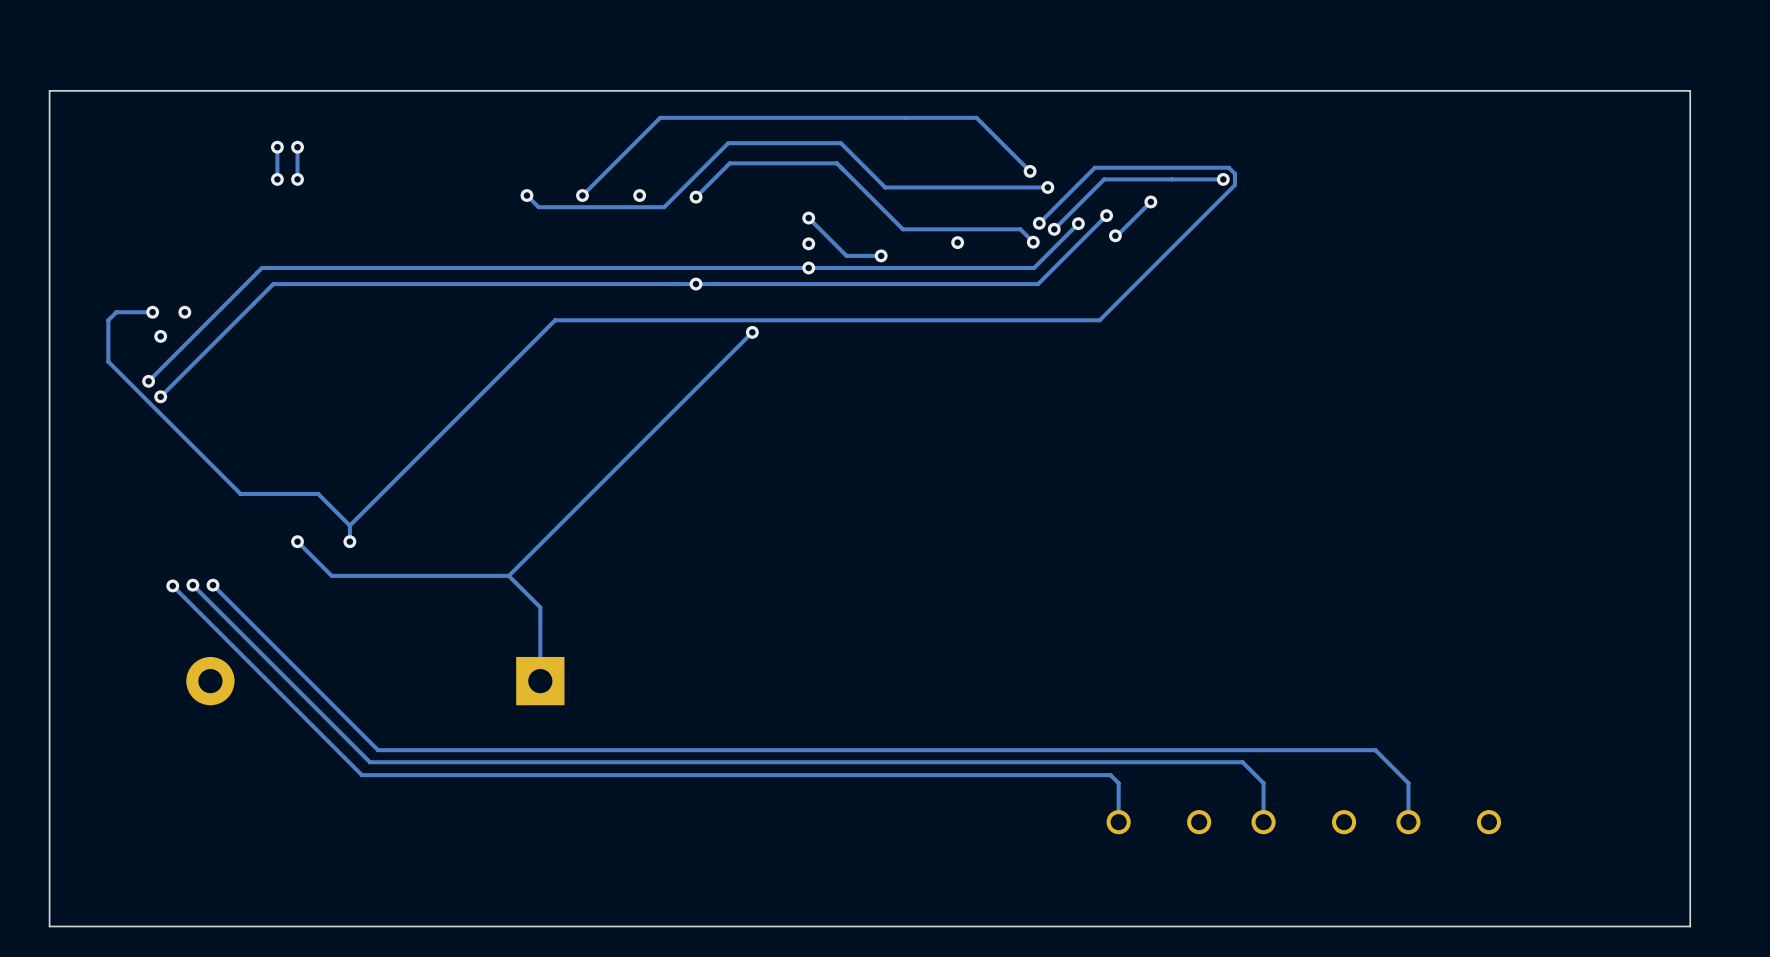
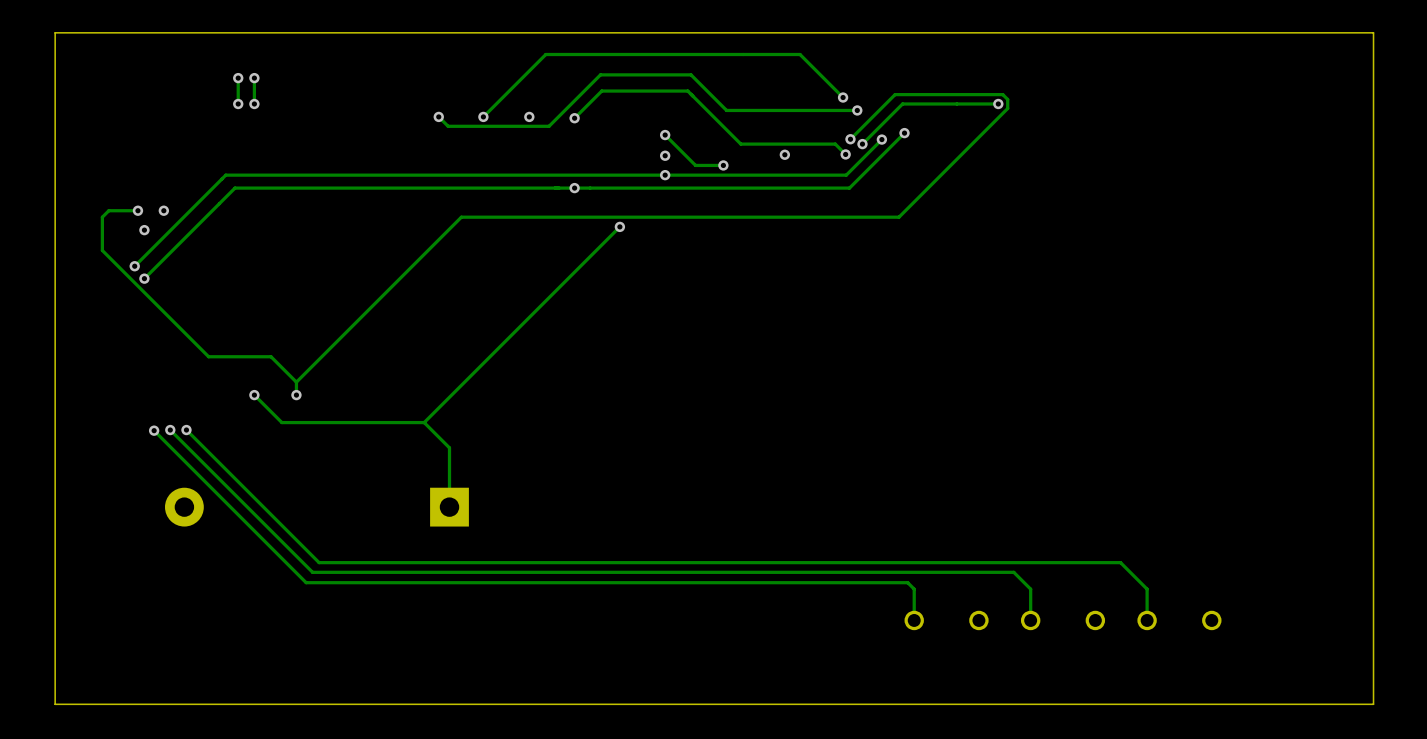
track: (1150, 201) (1115, 235) -> none
via: (1150, 201) -> none
via: (1115, 235) -> none

